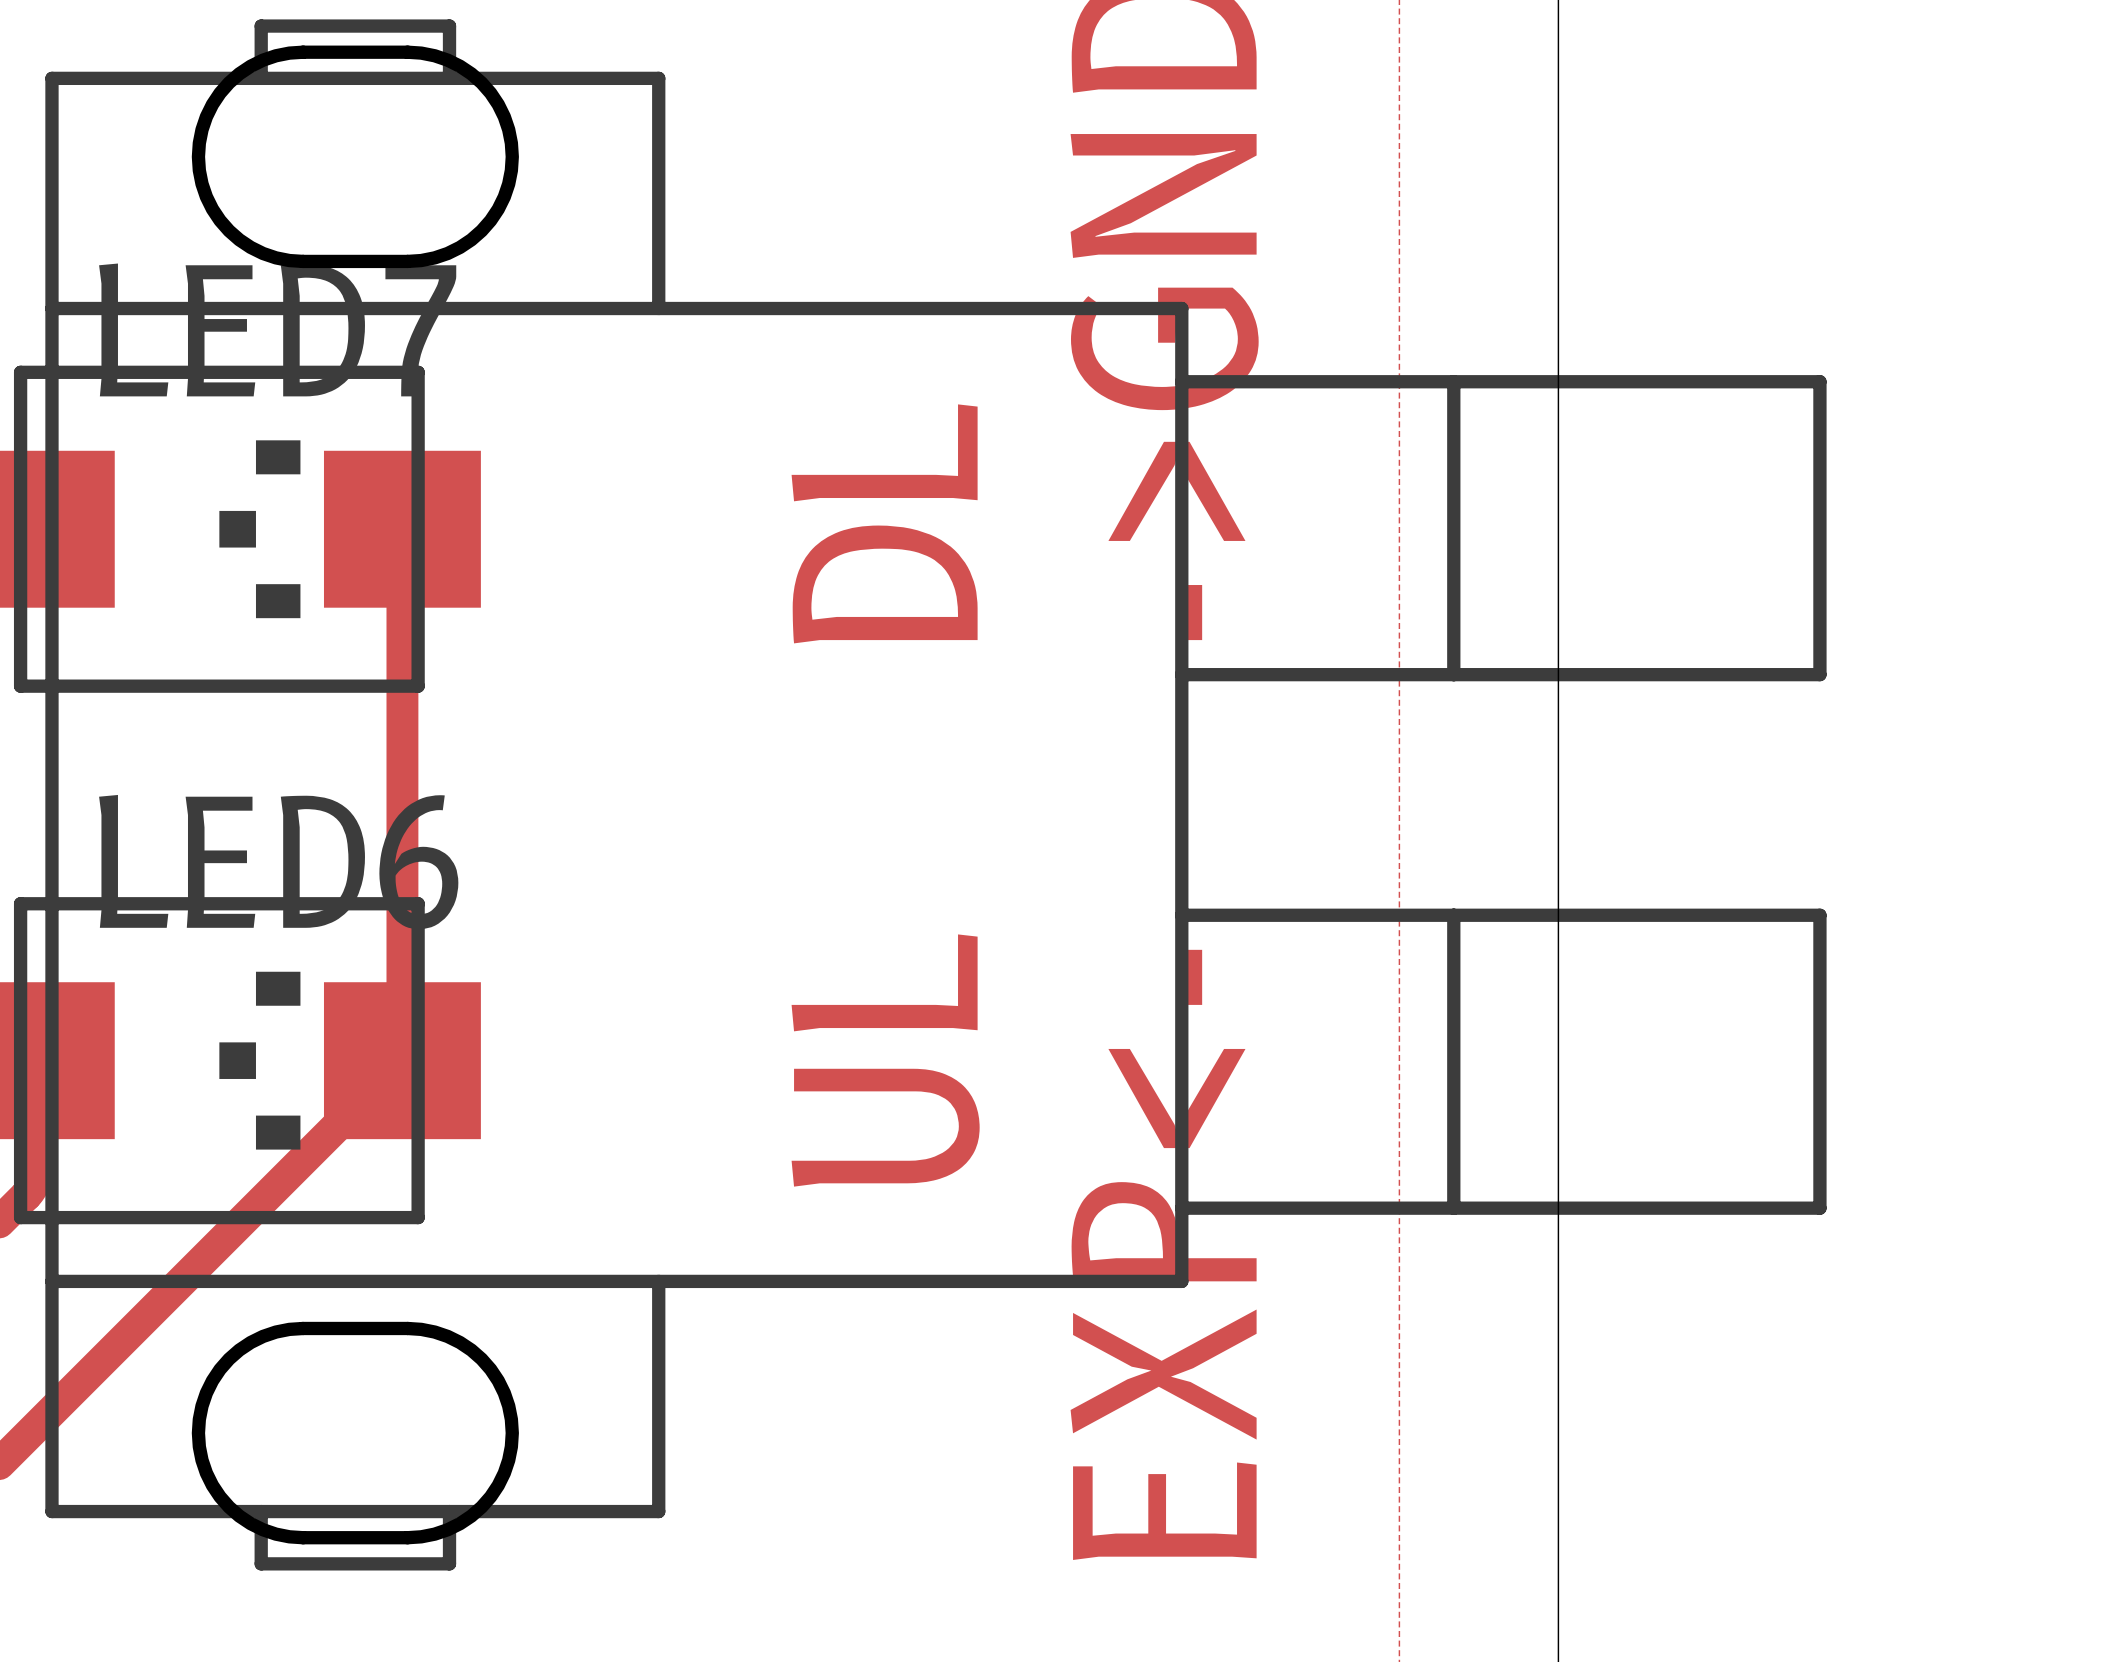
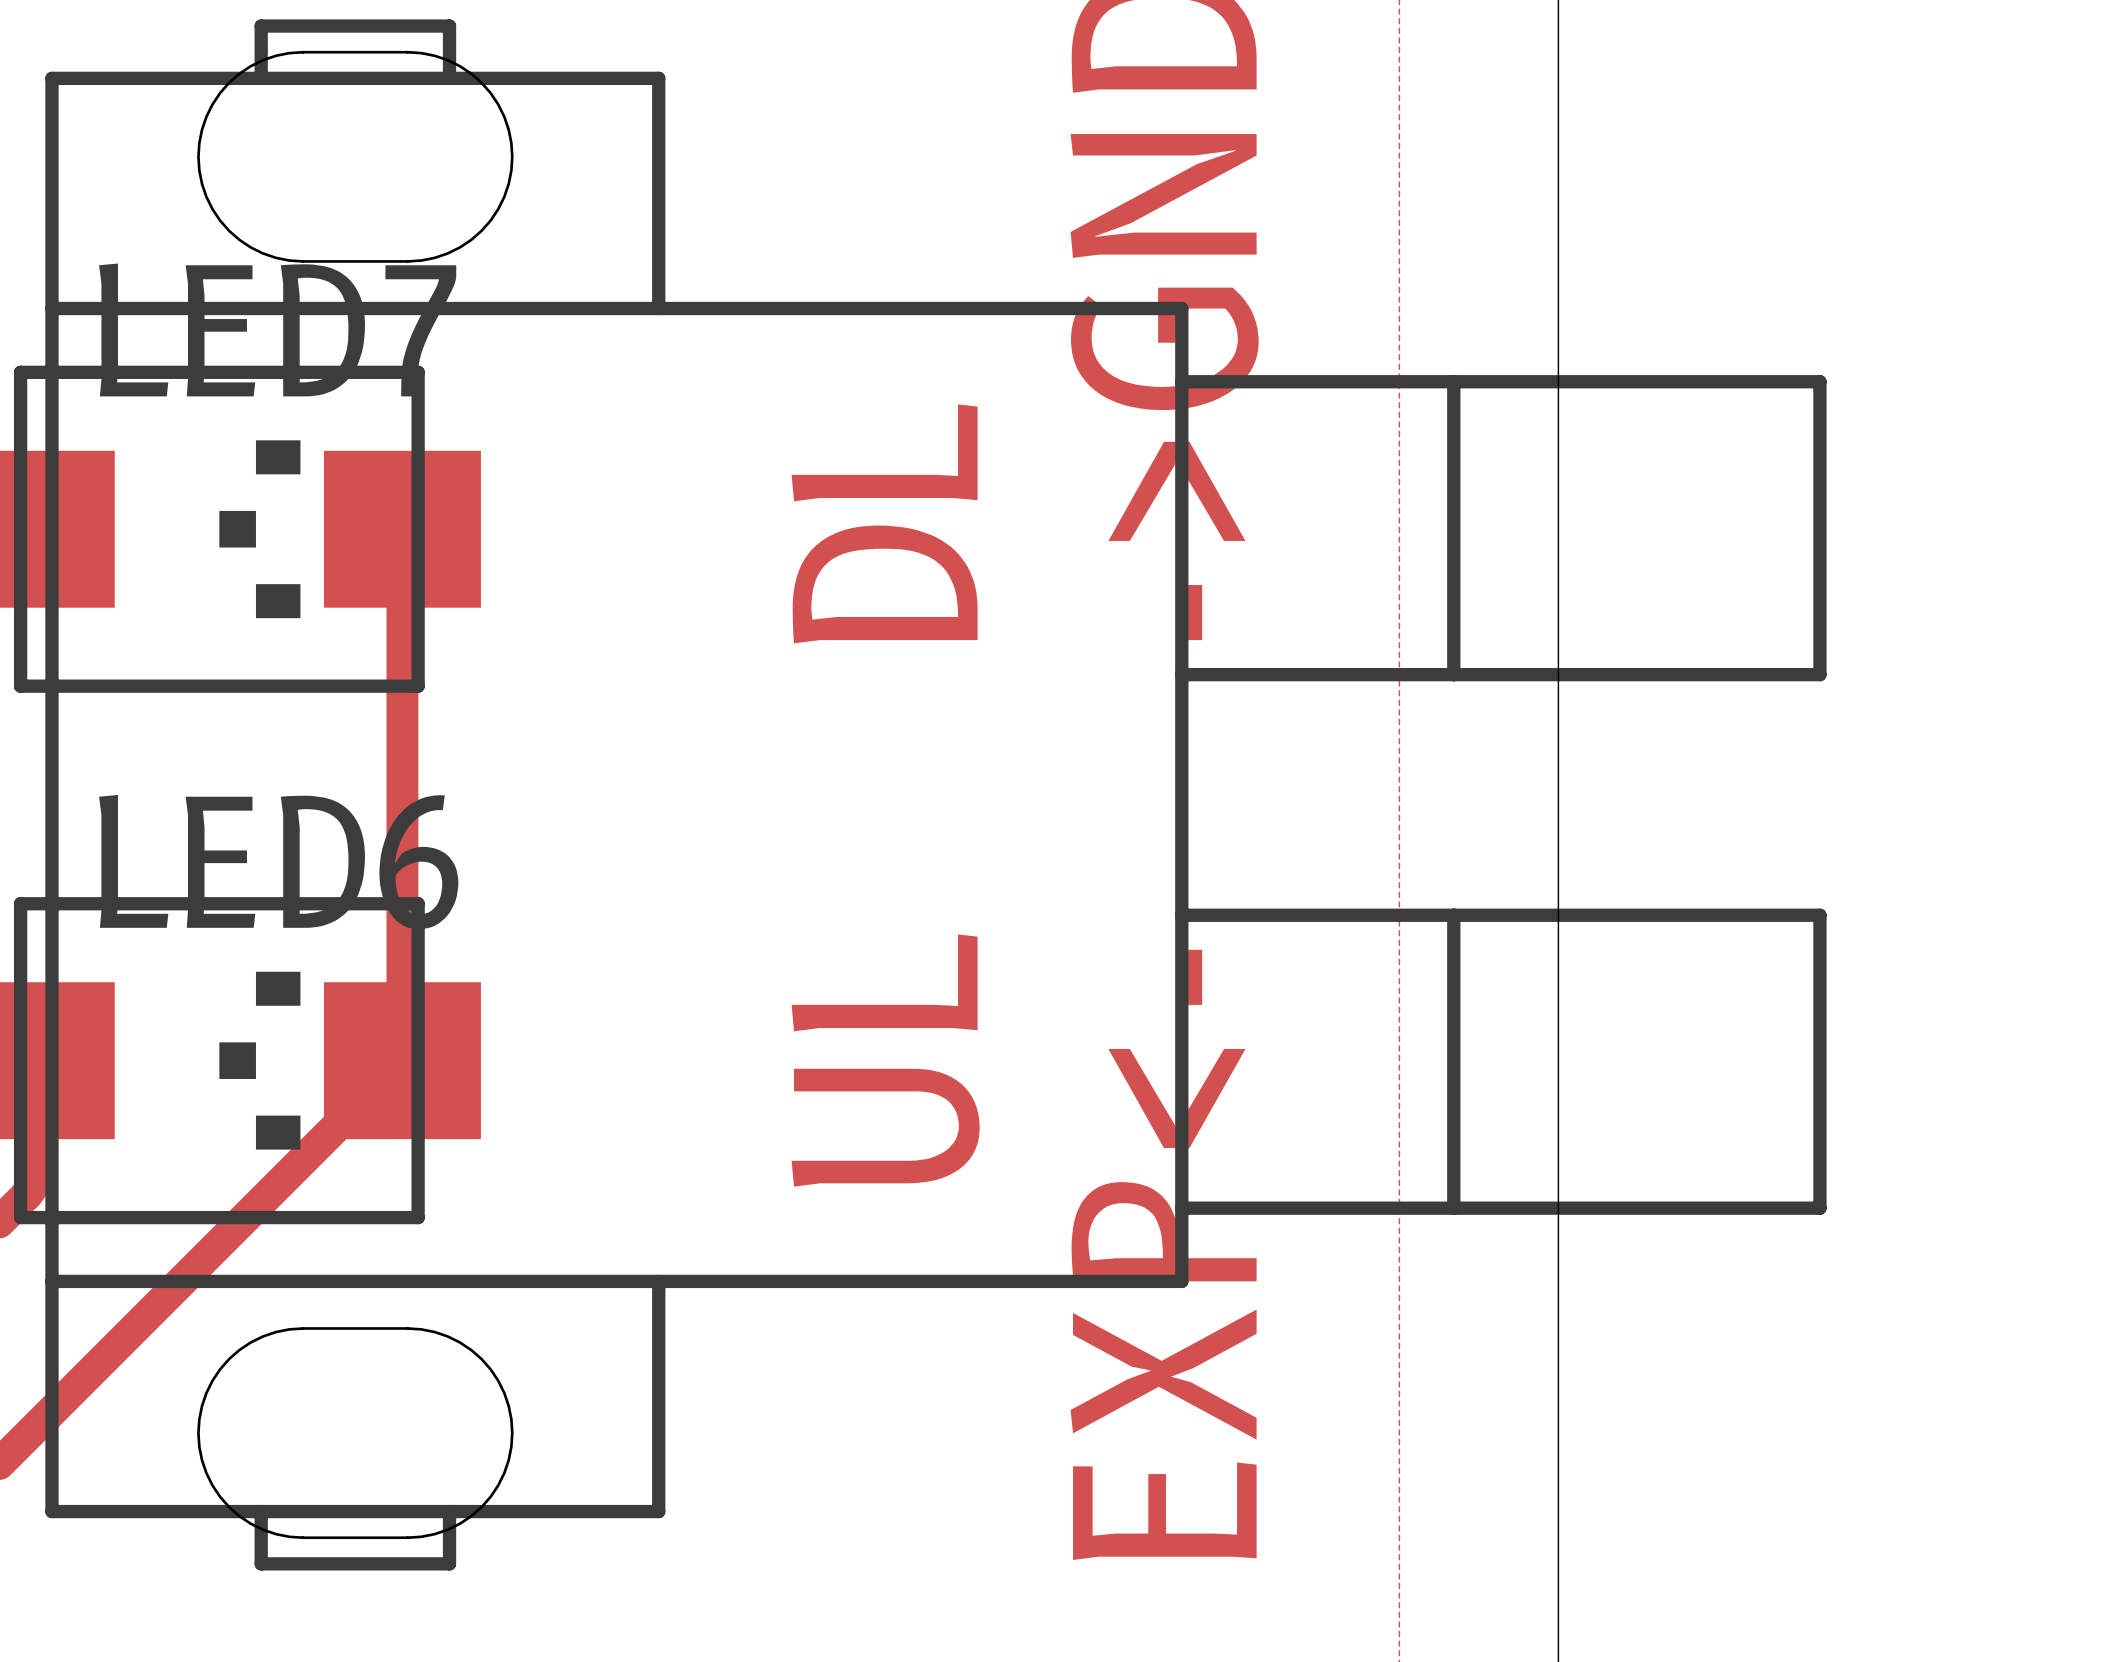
drawing shape: [13, 19, 1827, 1571] -> [13, 19, 1827, 1571]

